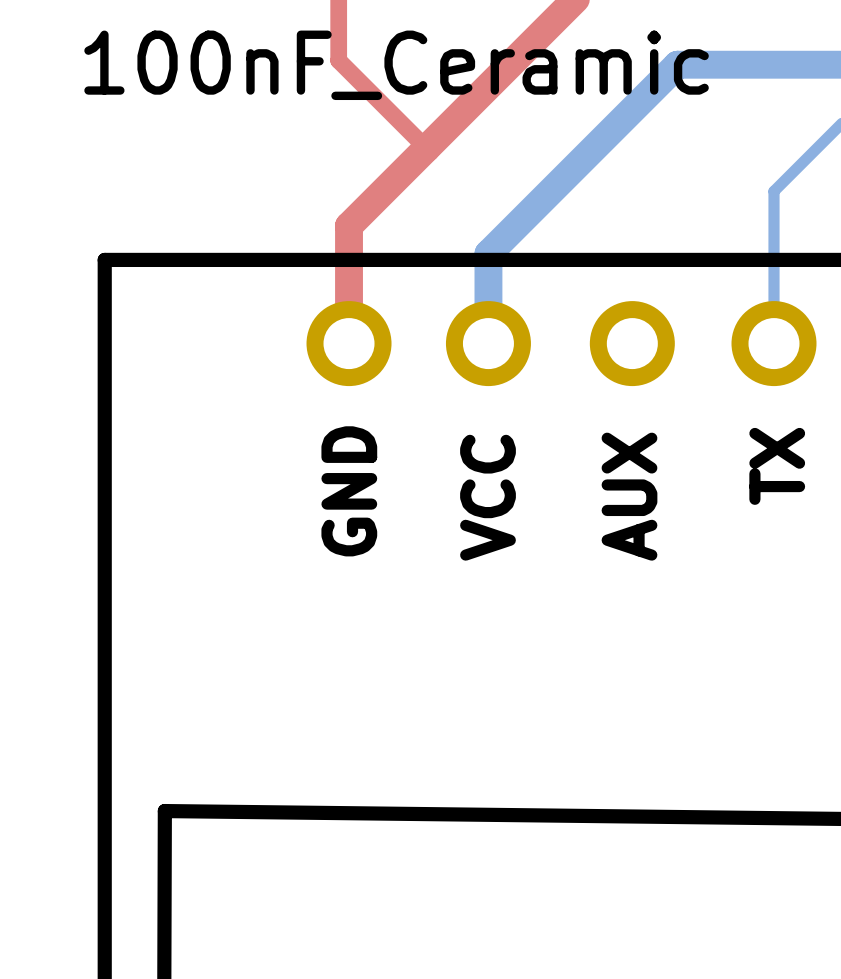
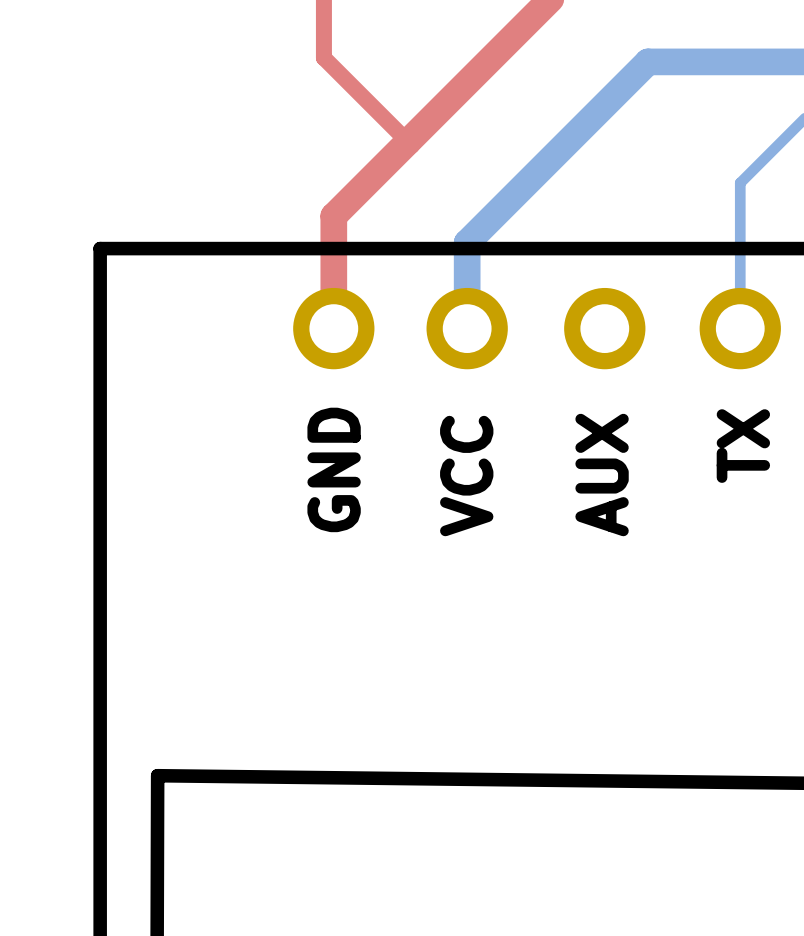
part value: 100nF_Ceramic (396, 65) -> none

